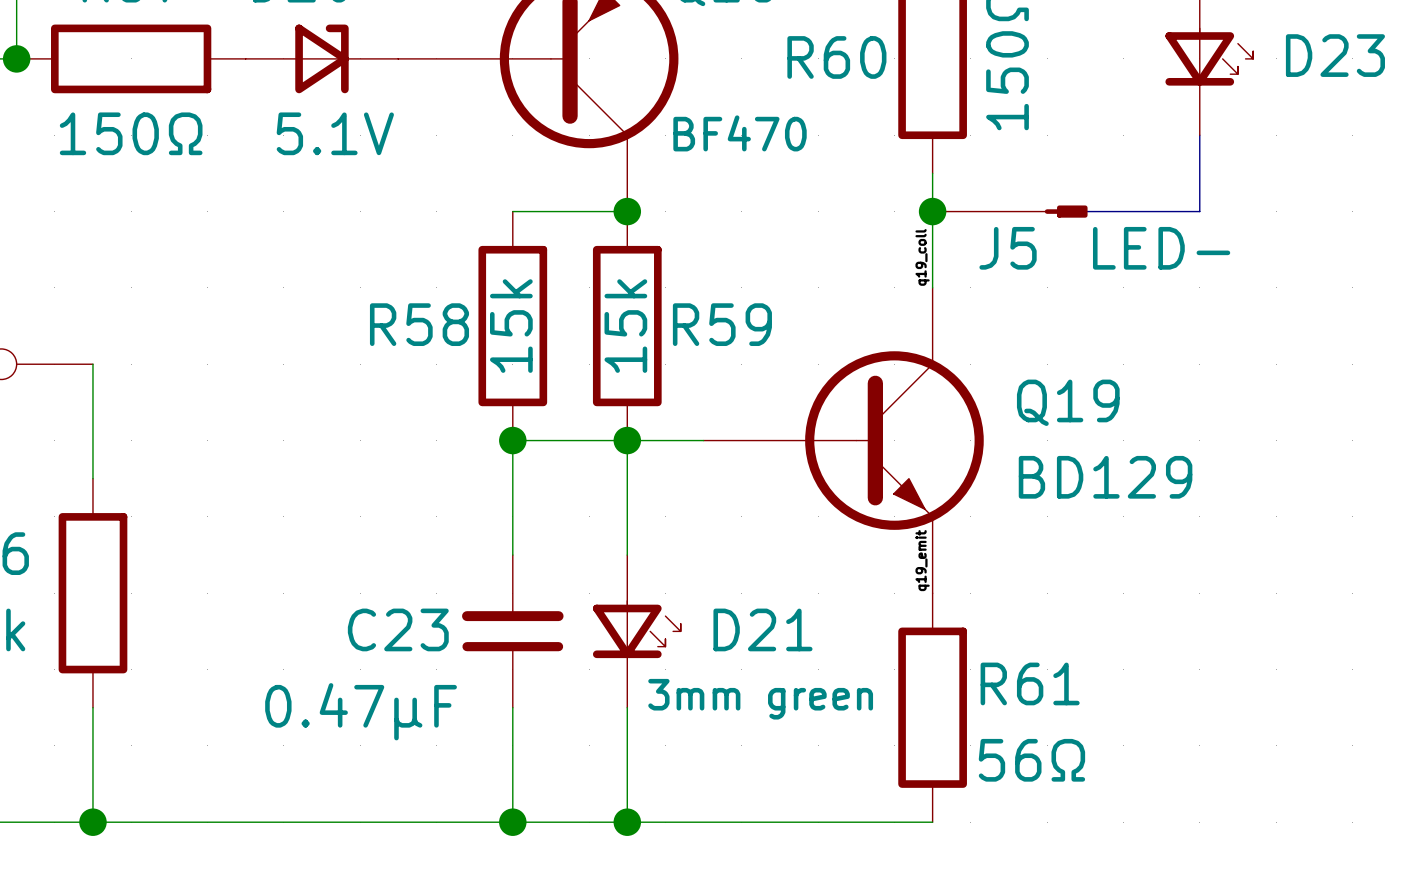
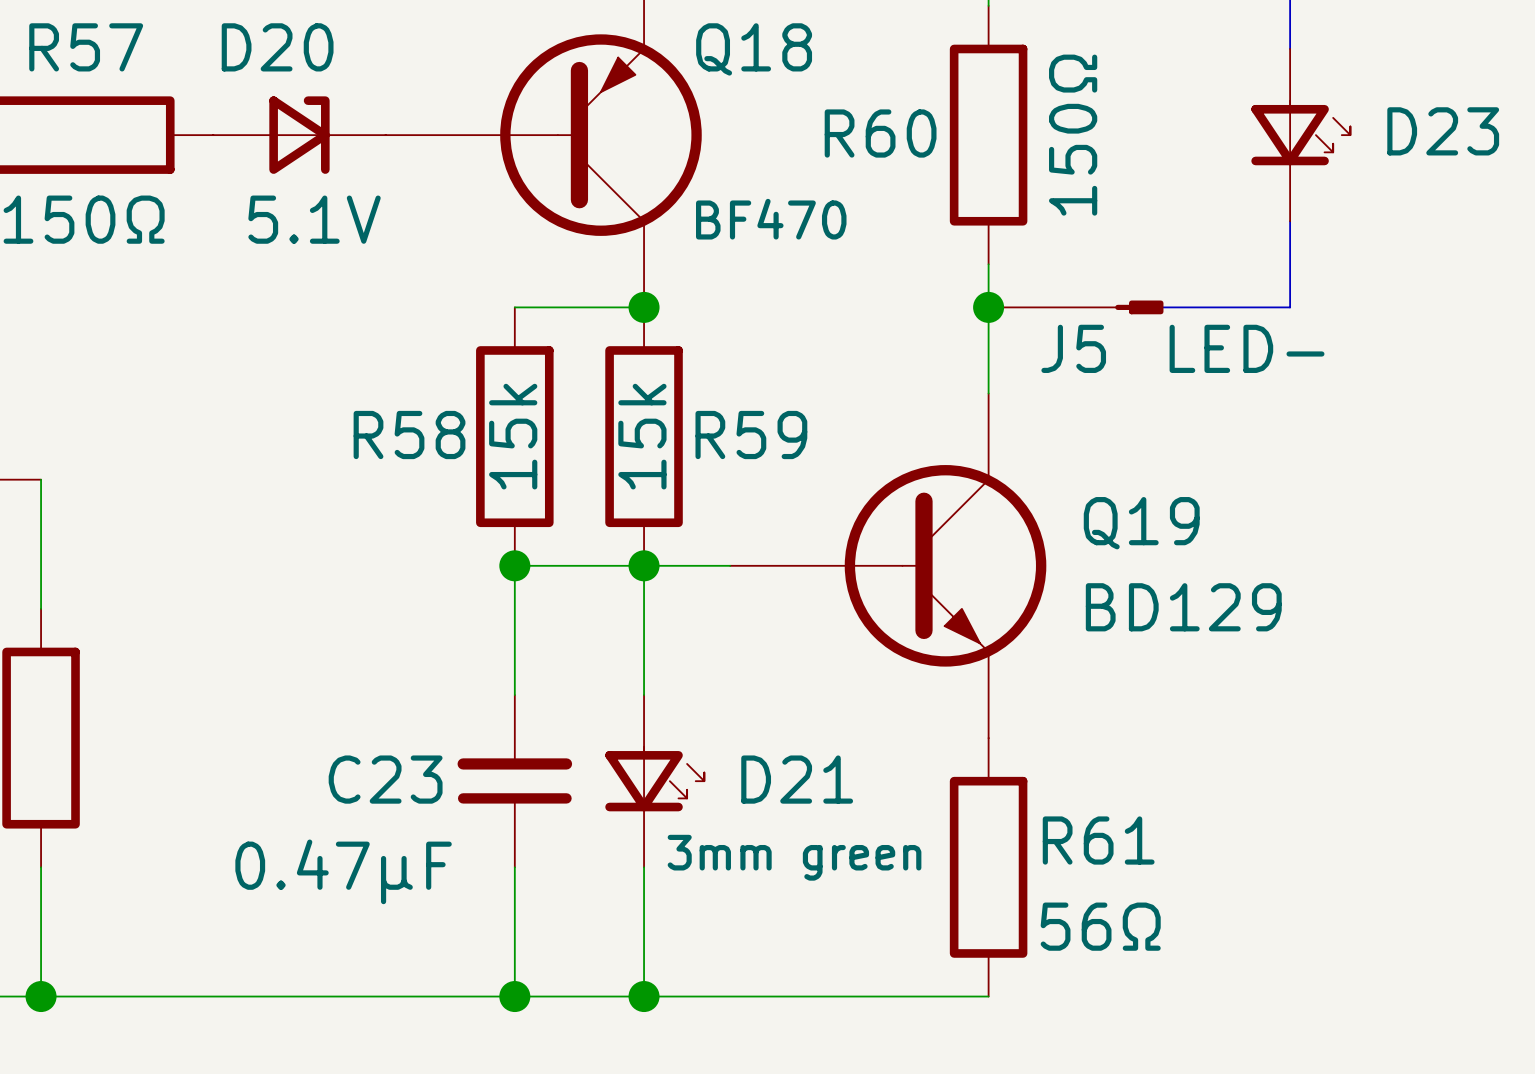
label: q19_coll (922, 257) -> none
label: q19_emit (922, 560) -> none

